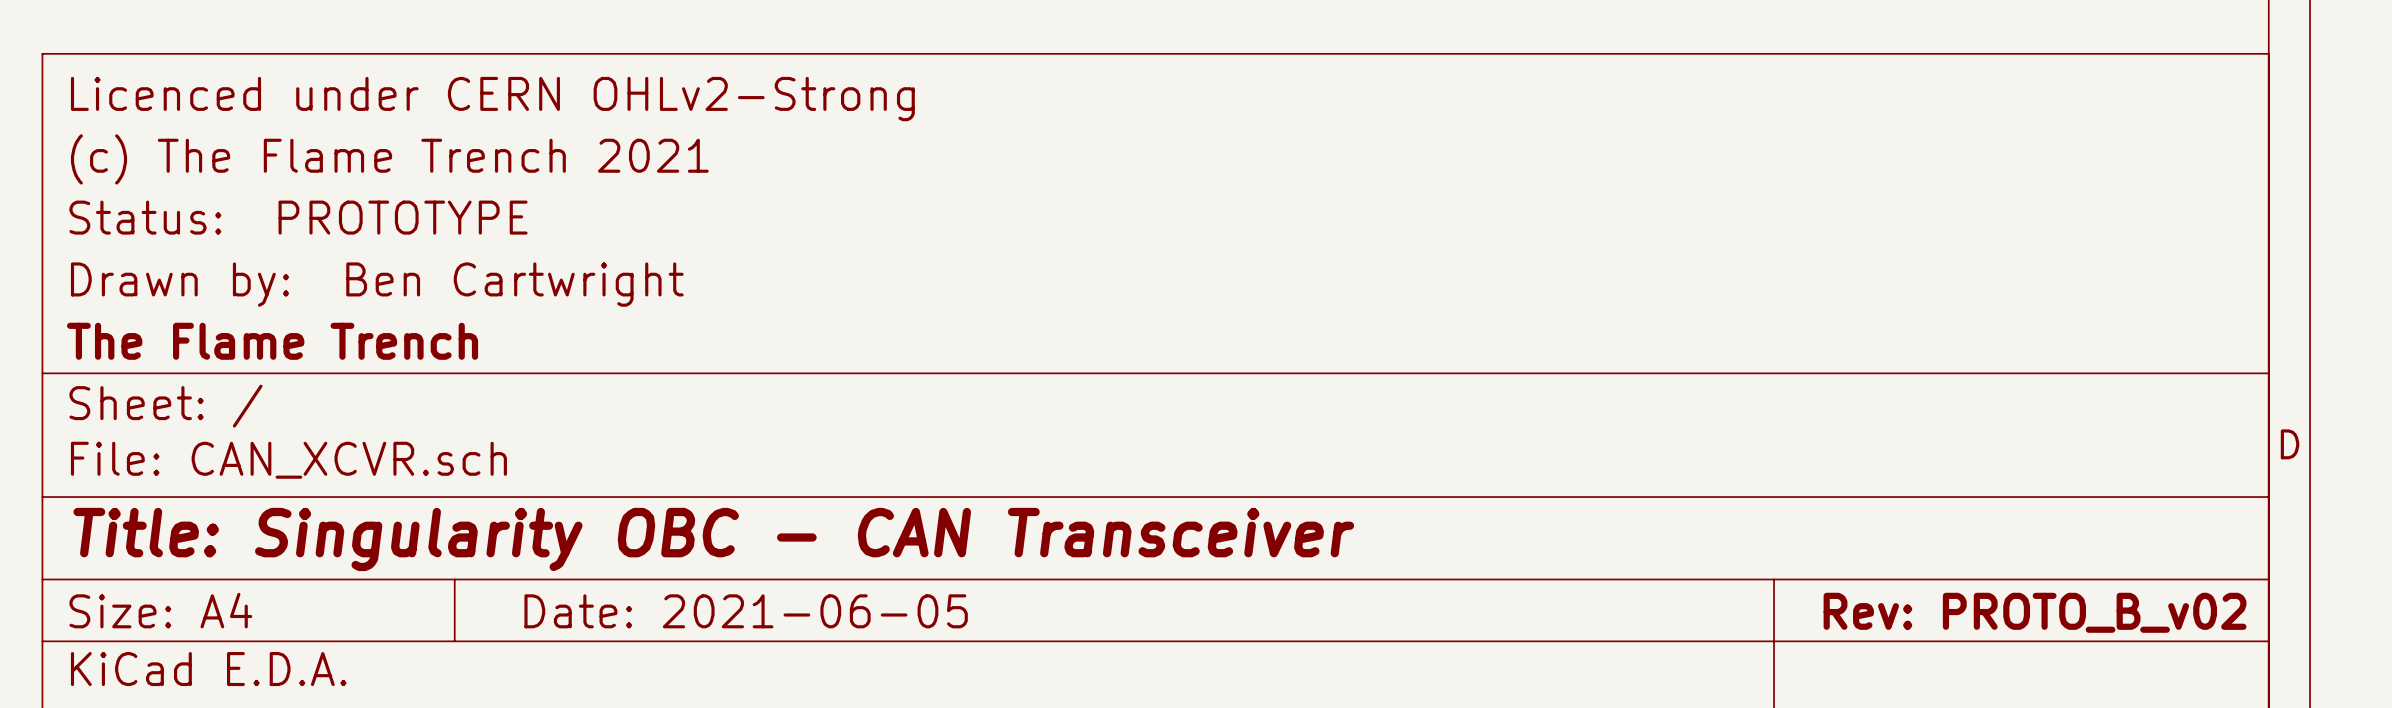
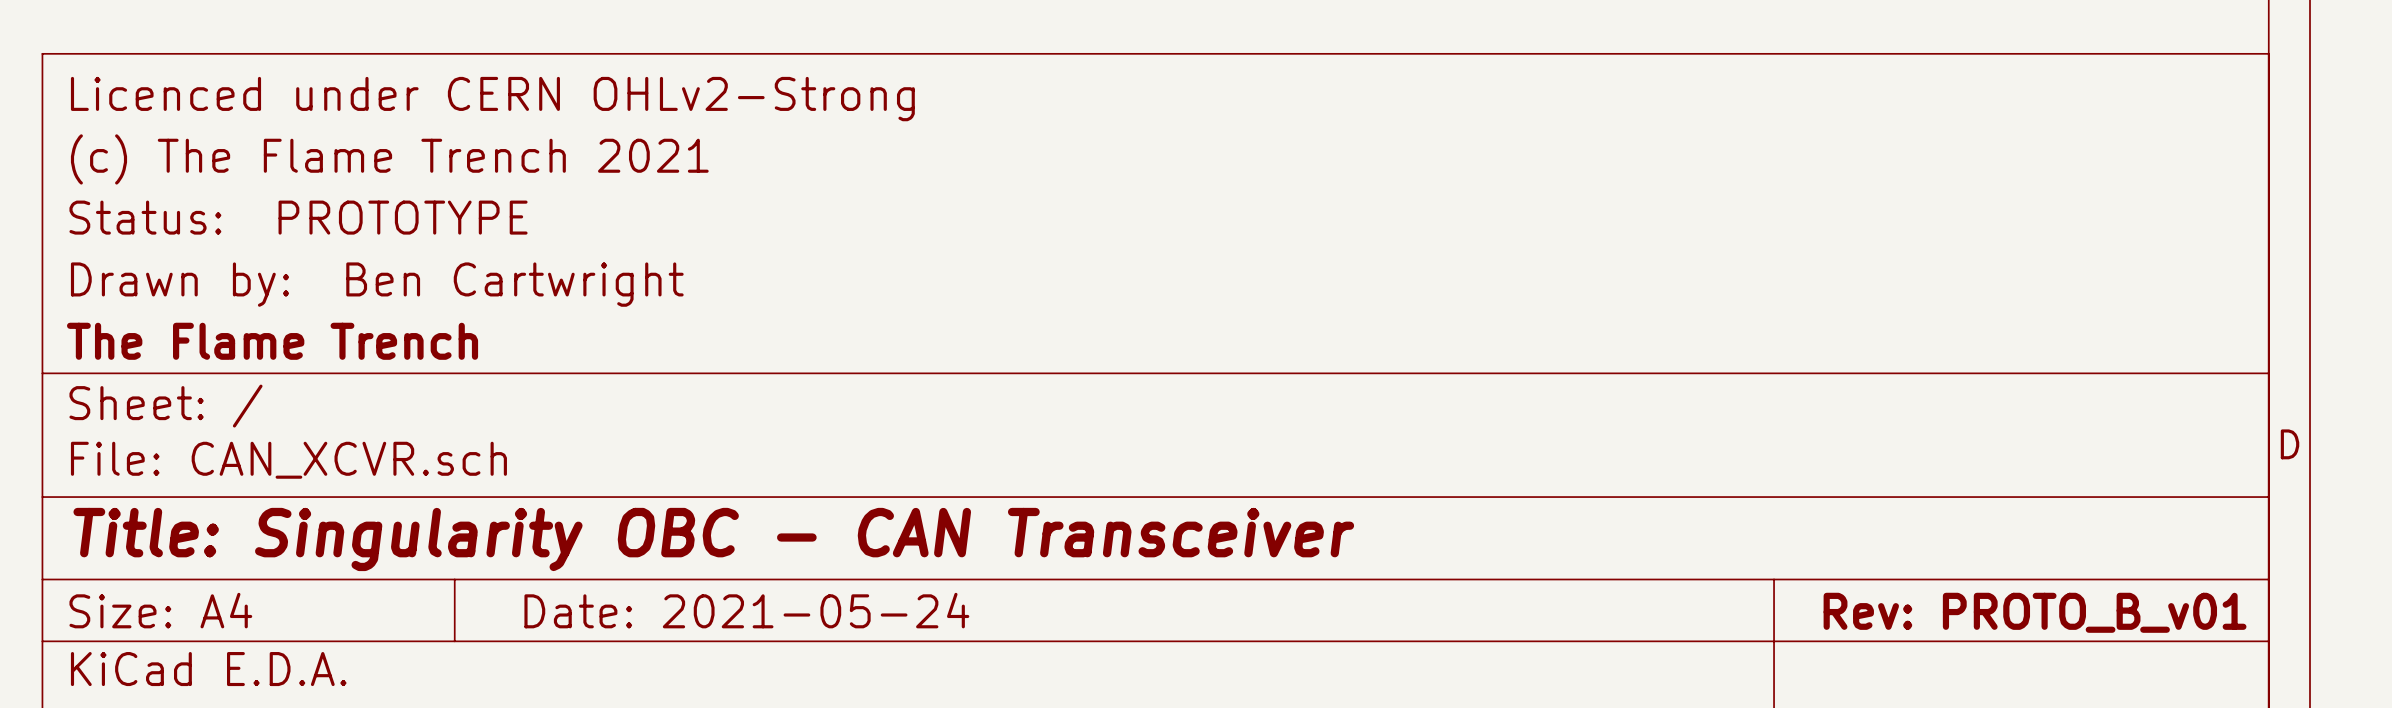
title block: Date: 2021-06-05 (746, 611) -> Date: 2021-05-24 (746, 610)
title block: Rev: PROTO_B_v02 (2035, 612) -> Rev: PROTO_B_v01 (2035, 612)

